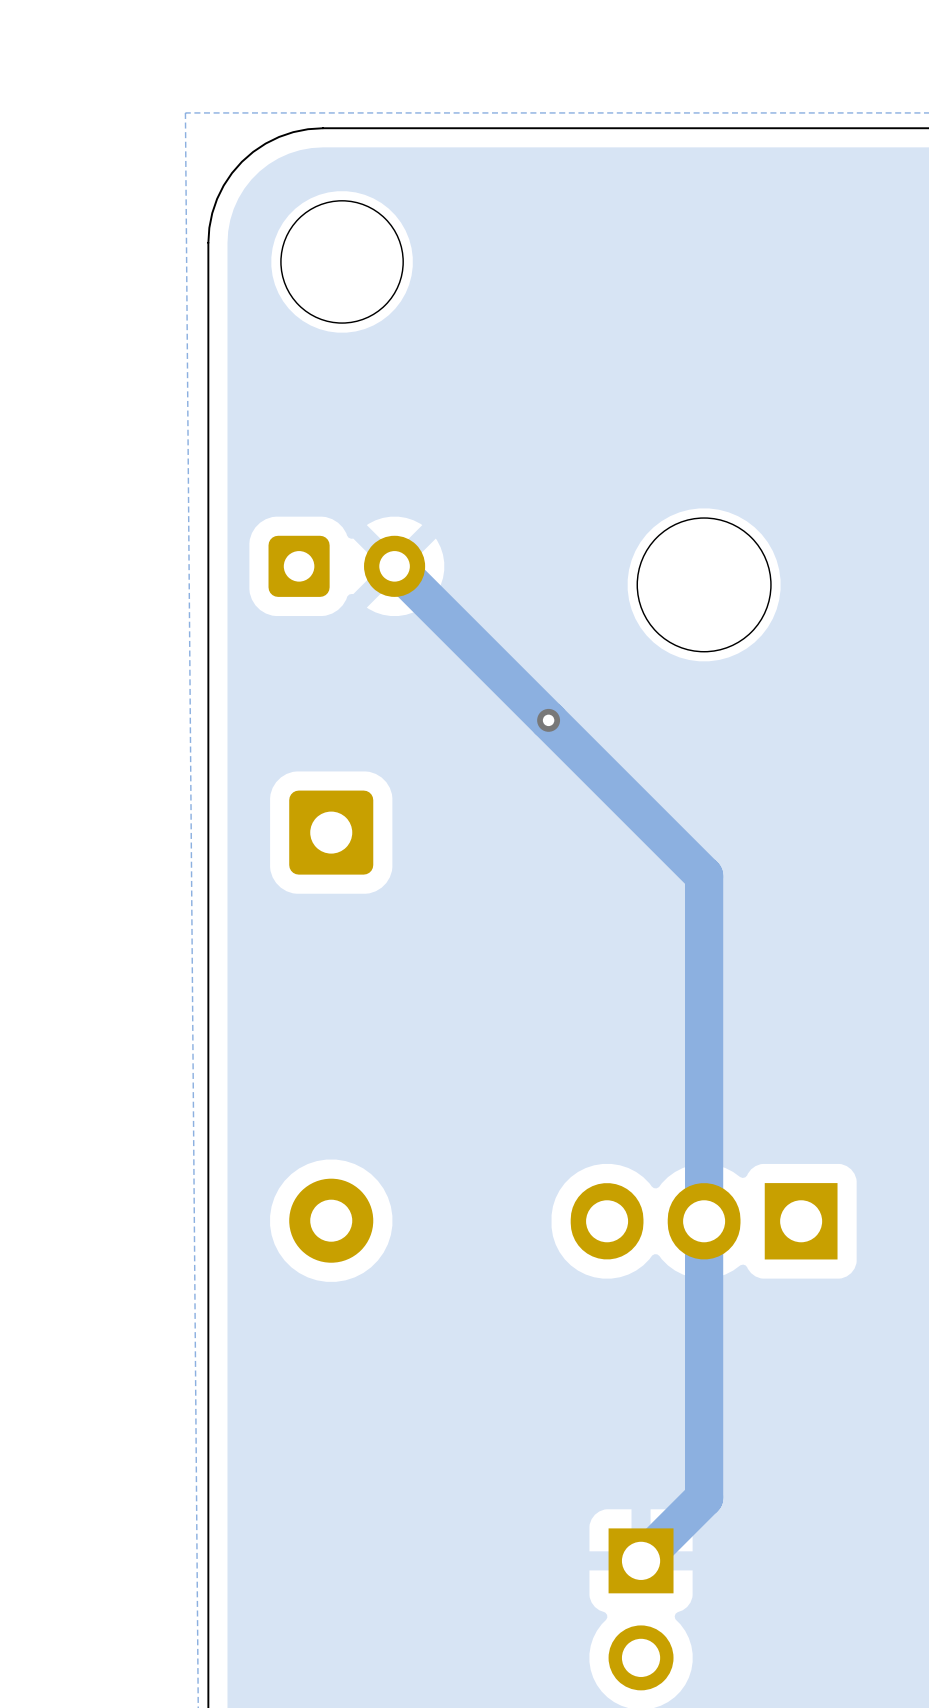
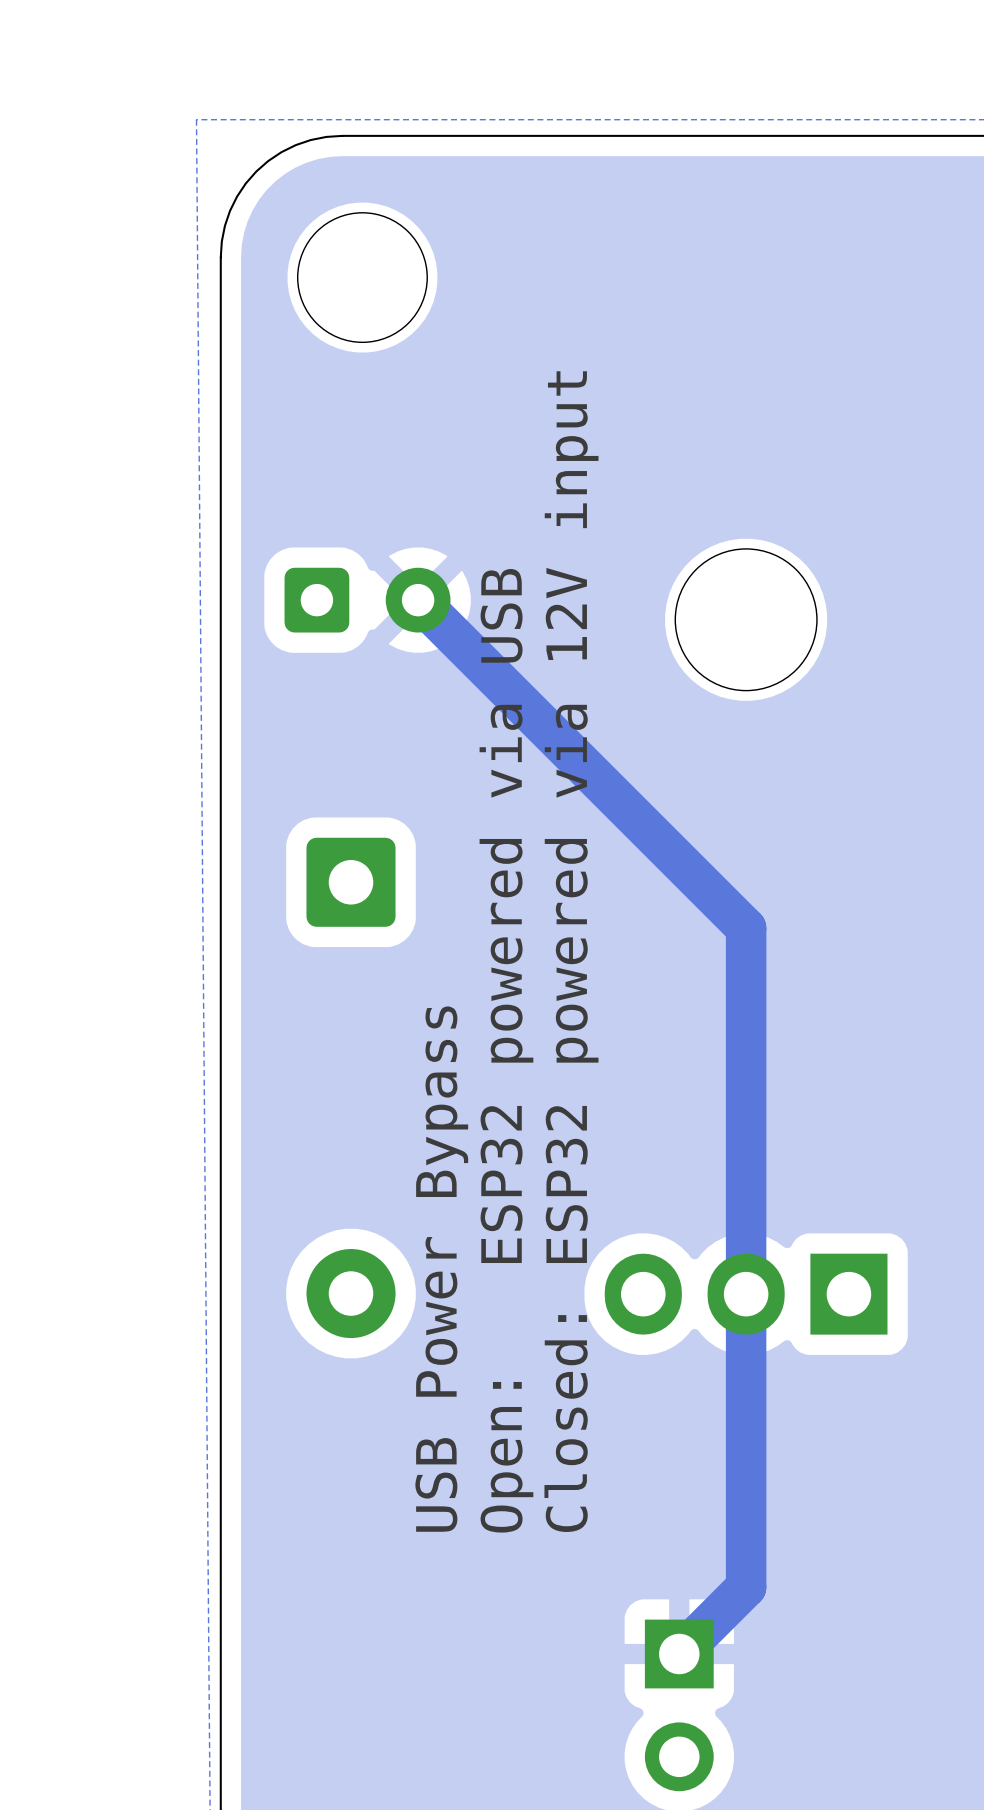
via: (548, 720) -> none
text: none -> Closed: ESP32 powered via 12V input (571, 951)
text: none -> Open: ESP32 powered via USB (506, 1050)
text: none -> USB Power Bypass (441, 1269)

